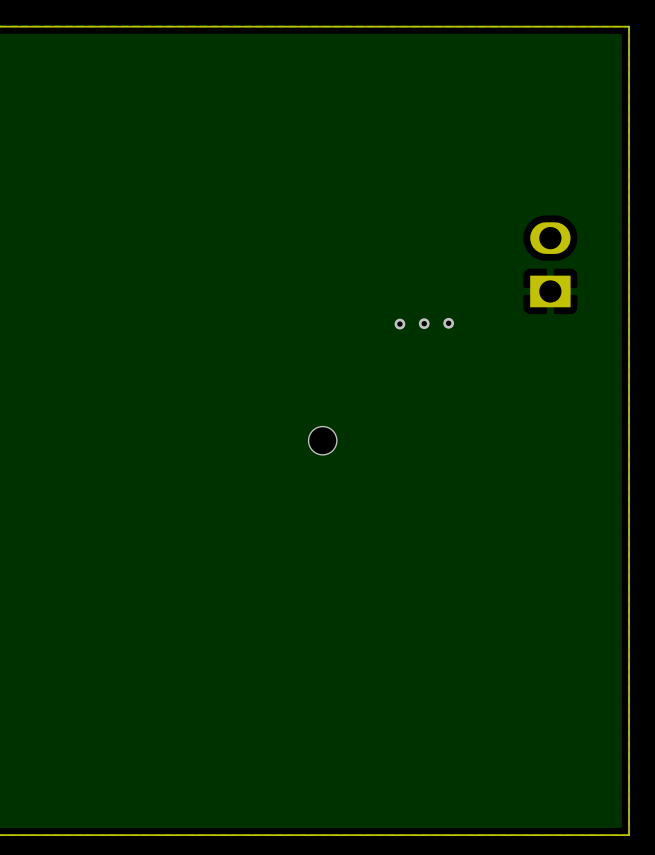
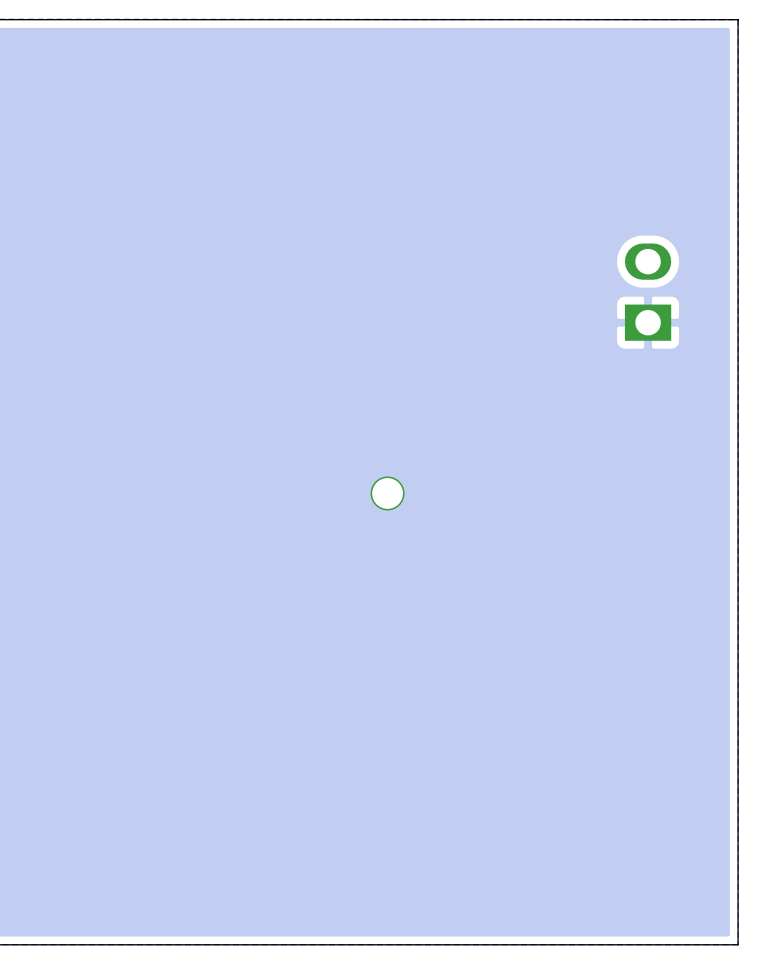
via: (424, 323) -> none
via: (448, 323) -> none
via: (399, 324) -> none

